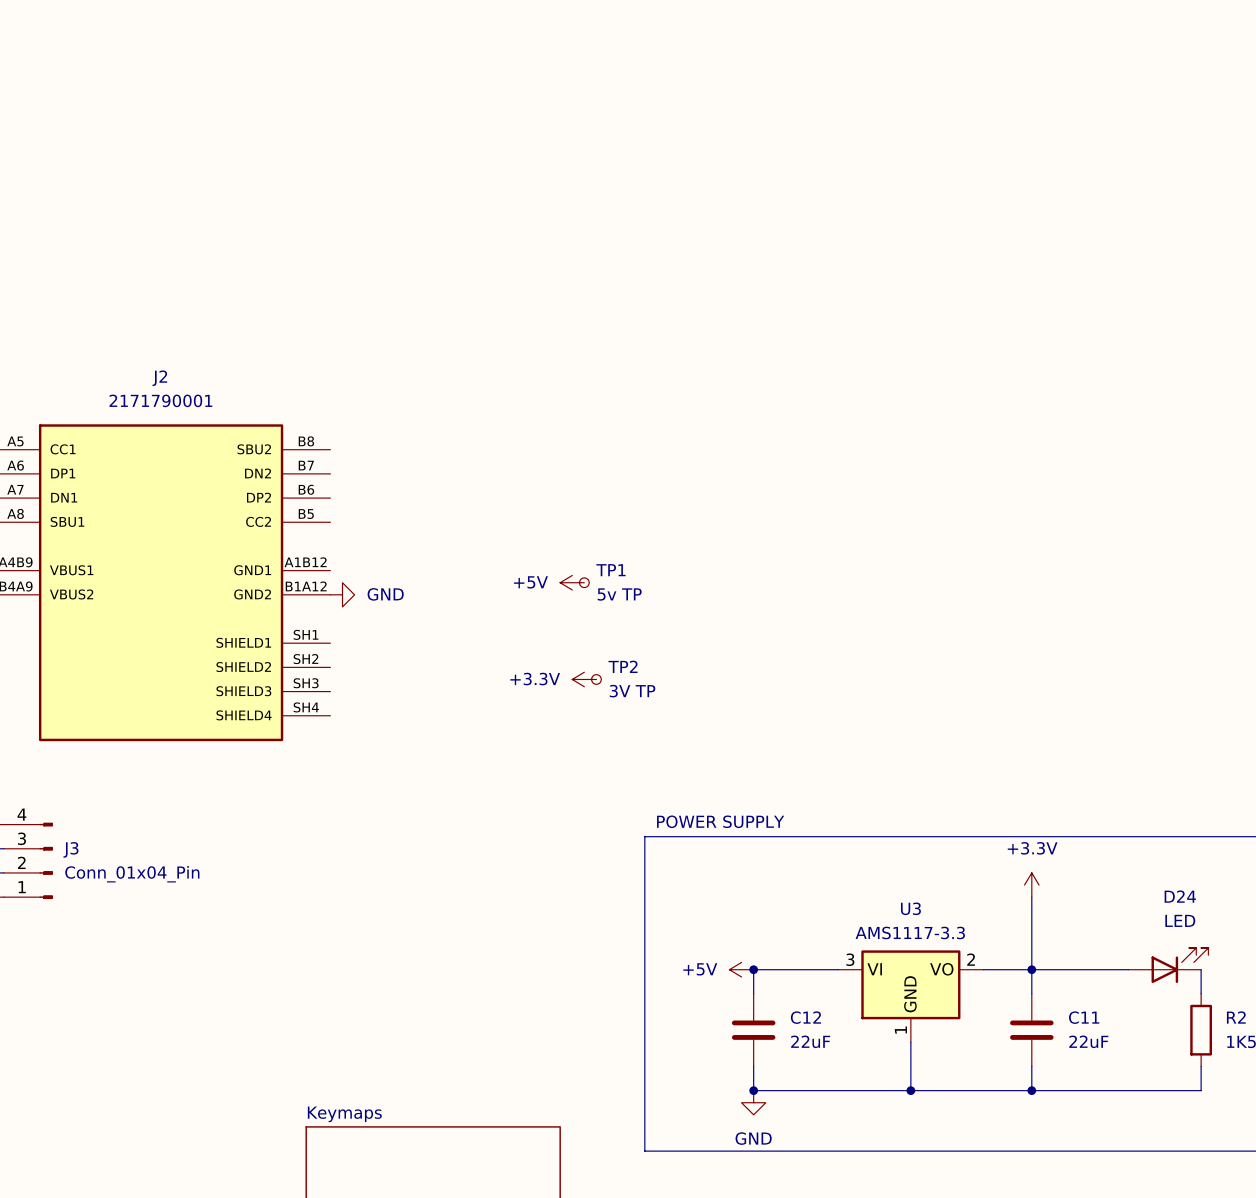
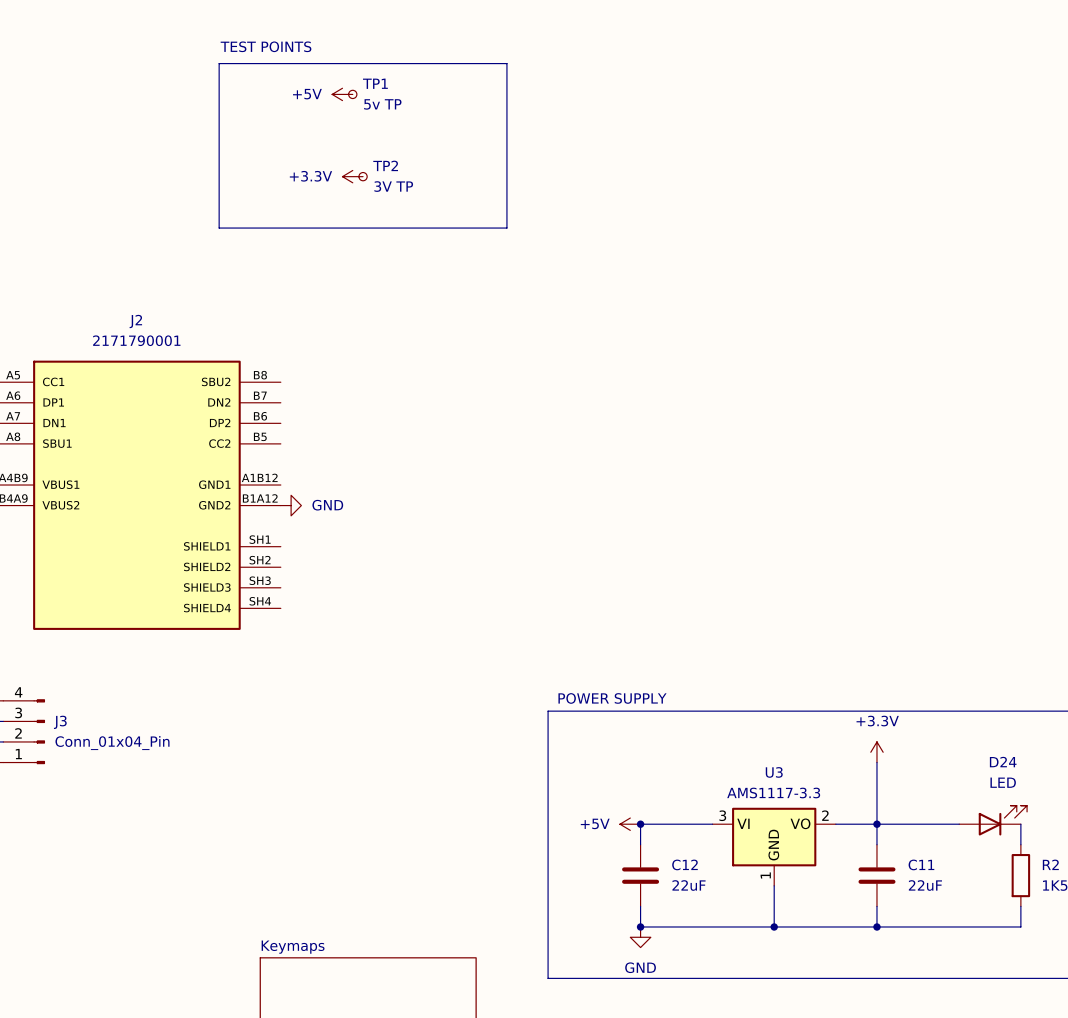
text: none -> TEST POINTS (266, 46)
line: none -> (219, 63) (506, 63) (506, 228) (219, 228) (219, 63)
power symbol: none -> +5V (342, 94)
power symbol: none -> +3.3V (352, 176)
power symbol: +5V (572, 582) -> none
TP1 position: (584, 582) -> (352, 94)
power symbol: +3.3V (584, 679) -> none
TP2 position: (596, 679) -> (363, 176)

